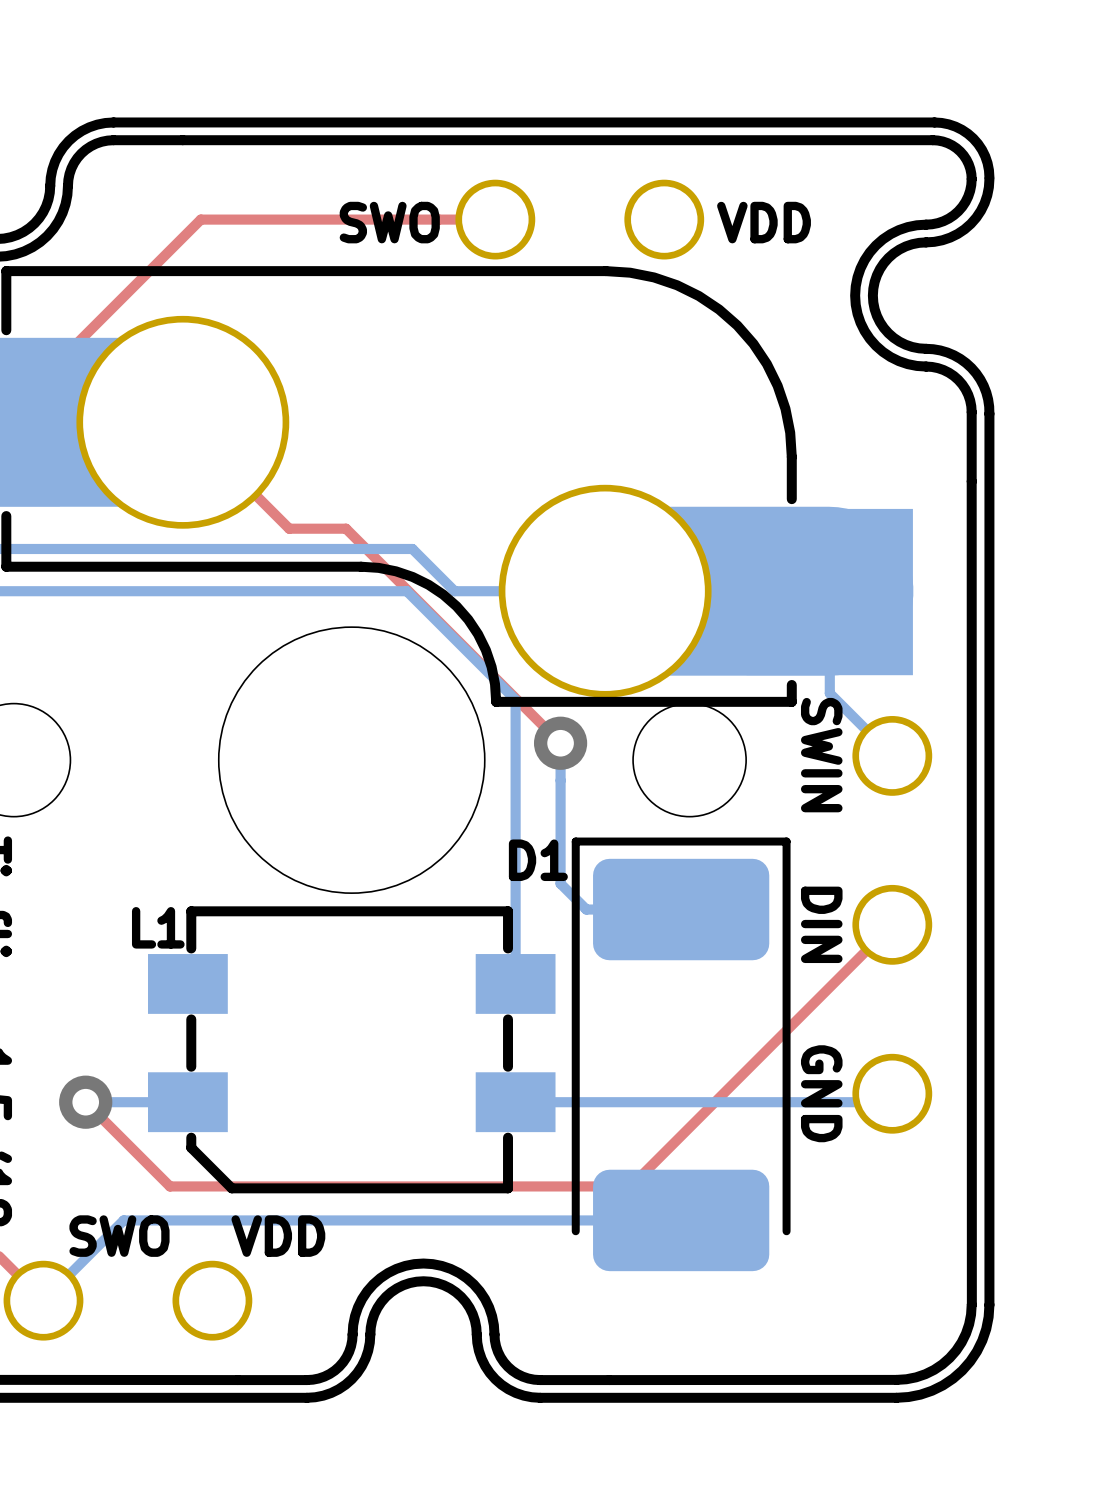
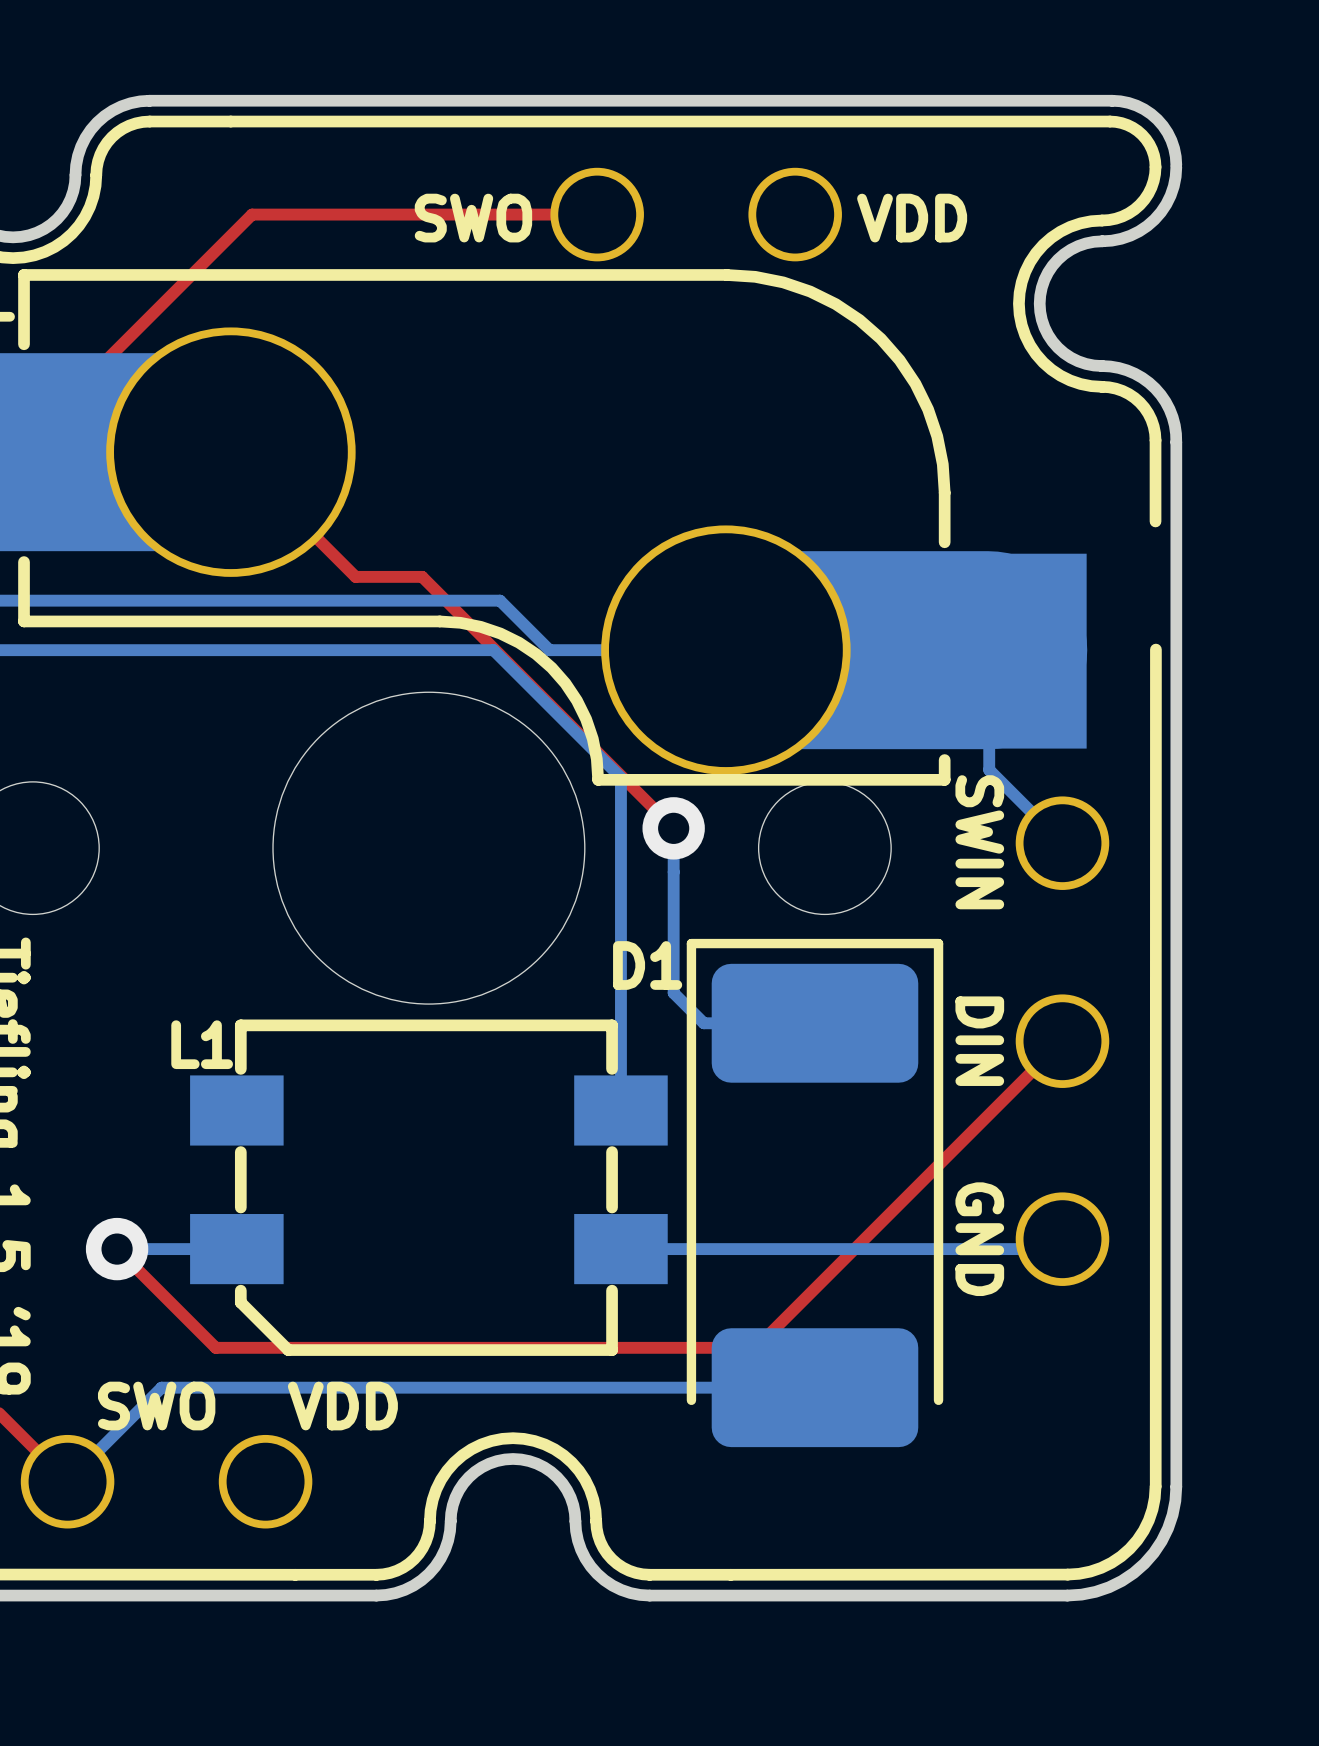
line: (971, 481) (971, 1304) -> (1155, 649) (1155, 1486)

